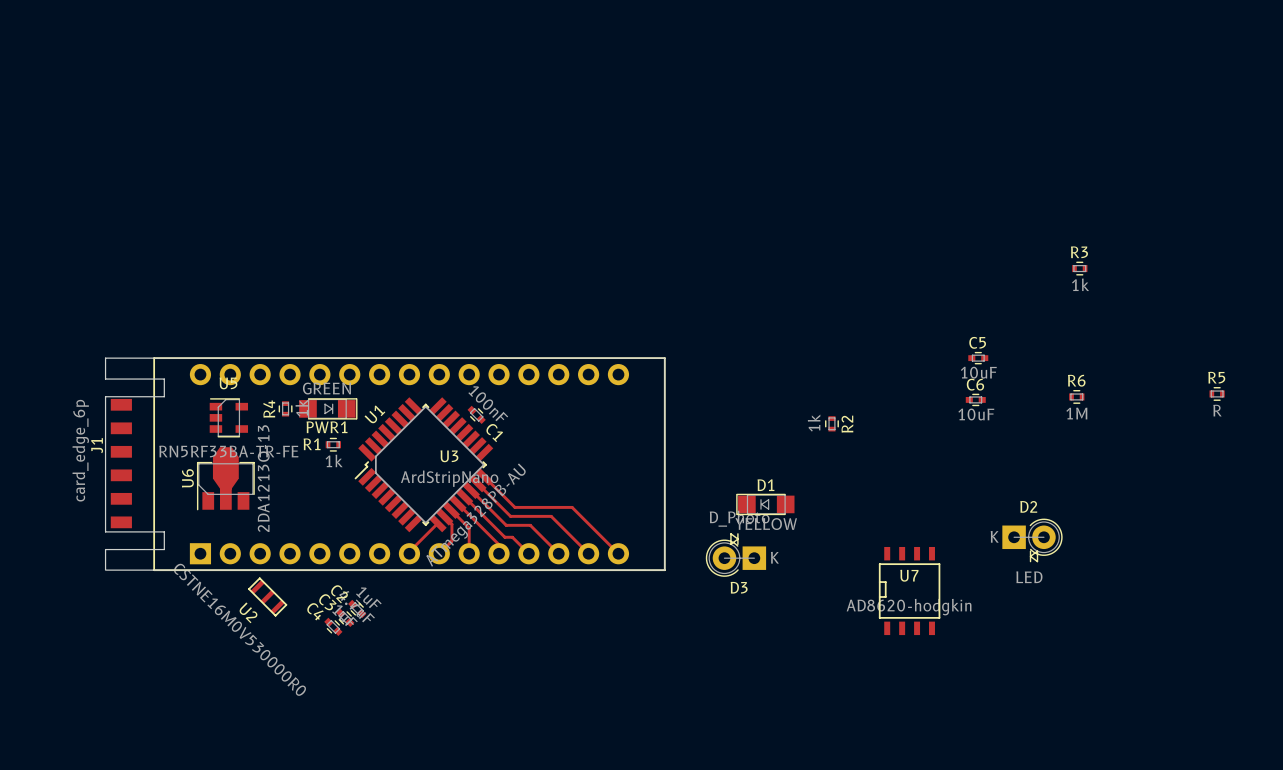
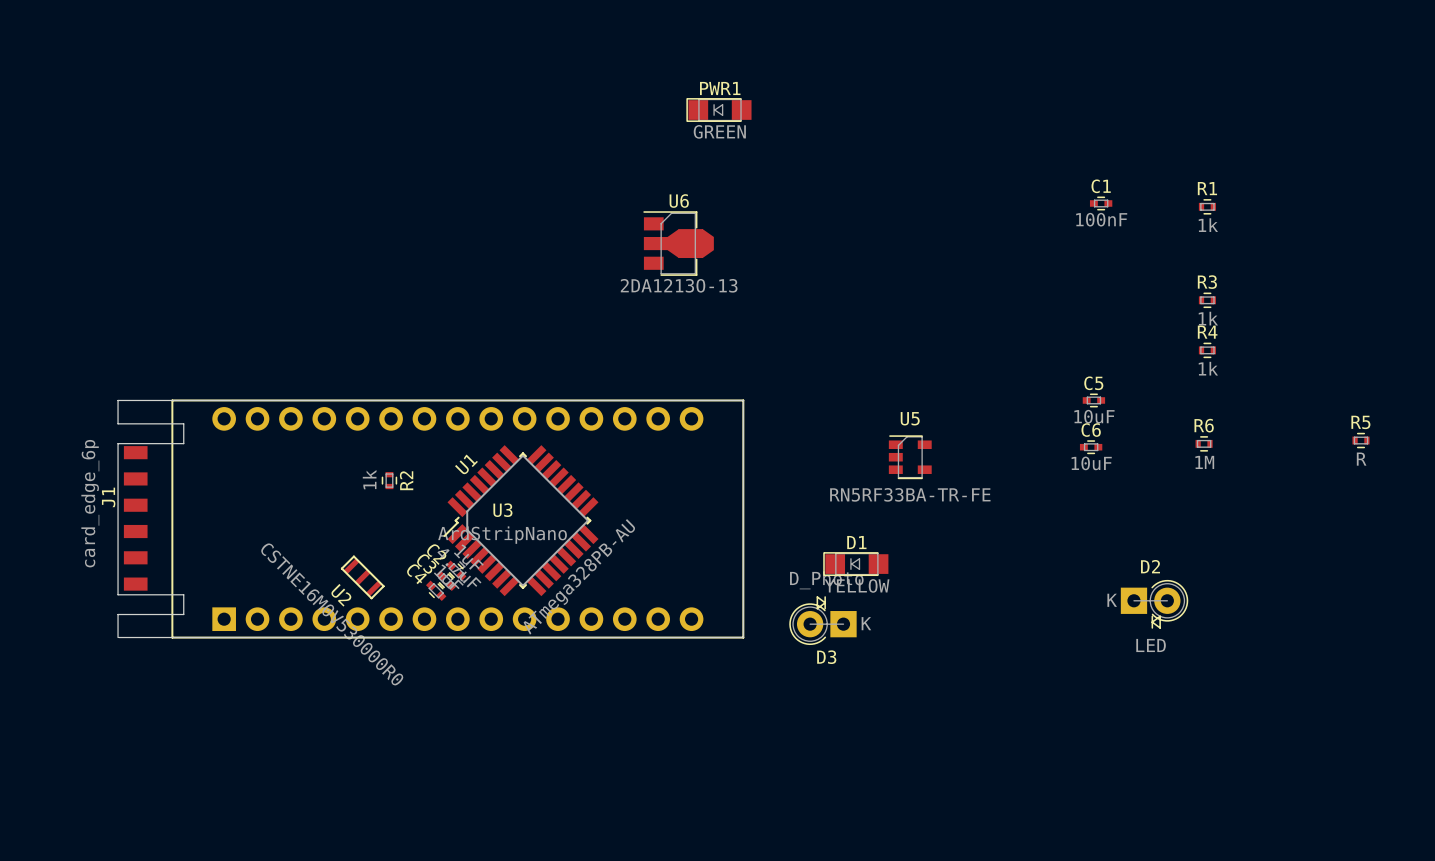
C1 value position: 100nF (488, 403) -> 100nF (1101, 219)
R4 rotation: 0° (285, 408) -> 90° clockwise (1207, 350)
R4 position: (285, 408) -> (1207, 350)
PWR1 rotation: 0° (328, 408) -> 180° (718, 110)
PWR1 position: (328, 408) -> (718, 110)
C1 rotation: 0° (476, 414) -> 45° counterclockwise (1101, 203)
C1 position: (476, 414) -> (1101, 203)
U5 position: (228, 417) -> (910, 457)
R2 position: (831, 423) -> (389, 480)
C1 name position: C1 (494, 433) -> C1 (1101, 186)
R1 name position: R1 (312, 444) -> R1 (1207, 188)
R1 position: (333, 444) -> (1207, 206)
U1 position: (423, 464) -> (520, 520)
track: (484, 476) (514, 507) (572, 507) (618, 553) -> none
U6 rotation: 0° (225, 478) -> 90° clockwise (678, 243)
U6 position: (225, 478) -> (678, 243)
track: (477, 483) (510, 516) (551, 516) (588, 553) -> none
track: (471, 490) (506, 525) (530, 525) (558, 553) -> none
track: (464, 496) (504, 537) (512, 537) (528, 553) -> none
track: (457, 503) (499, 544) (499, 553) -> none
track: (451, 510) (469, 528) (469, 553) -> none
track: (444, 516) (451, 524) (451, 541) (439, 553) -> none
track: (437, 523) (409, 553) -> none
U7: AD8620-hodgkin (909, 591) -> none
U2 position: (267, 596) -> (362, 577)
C2 position: (357, 608) -> (456, 570)
C3 position: (345, 617) -> (446, 580)
C4 position: (333, 626) -> (436, 590)

